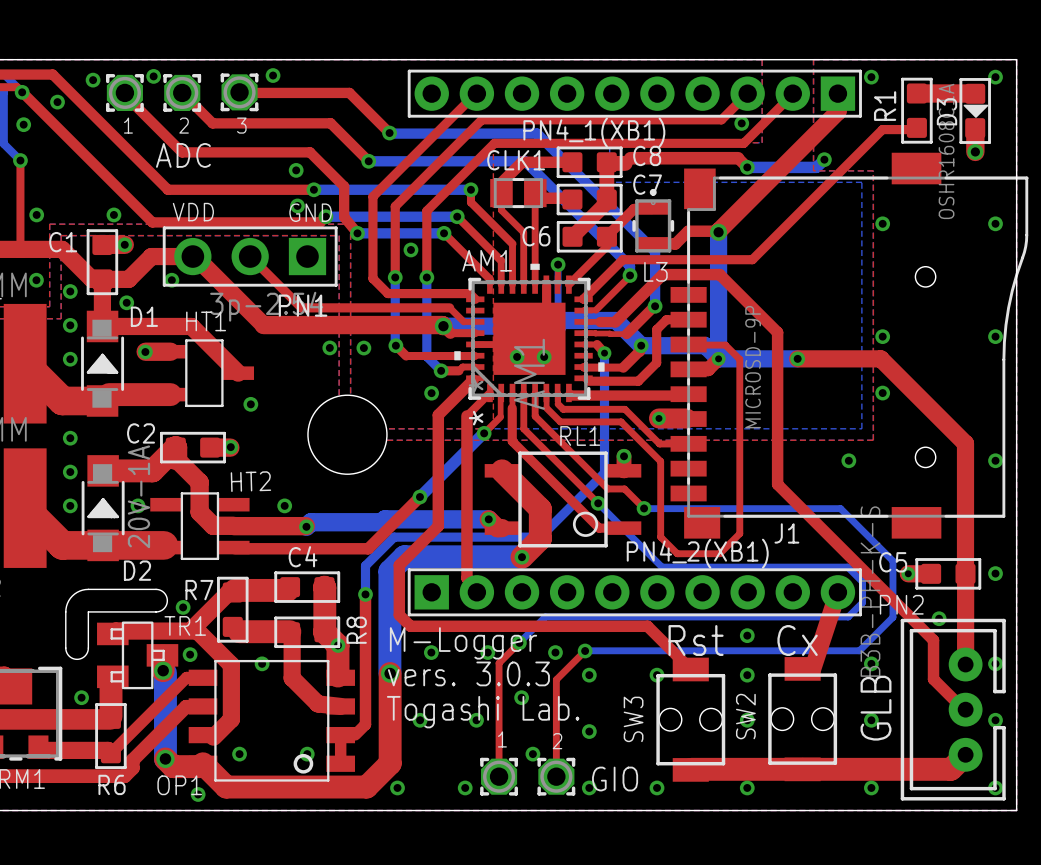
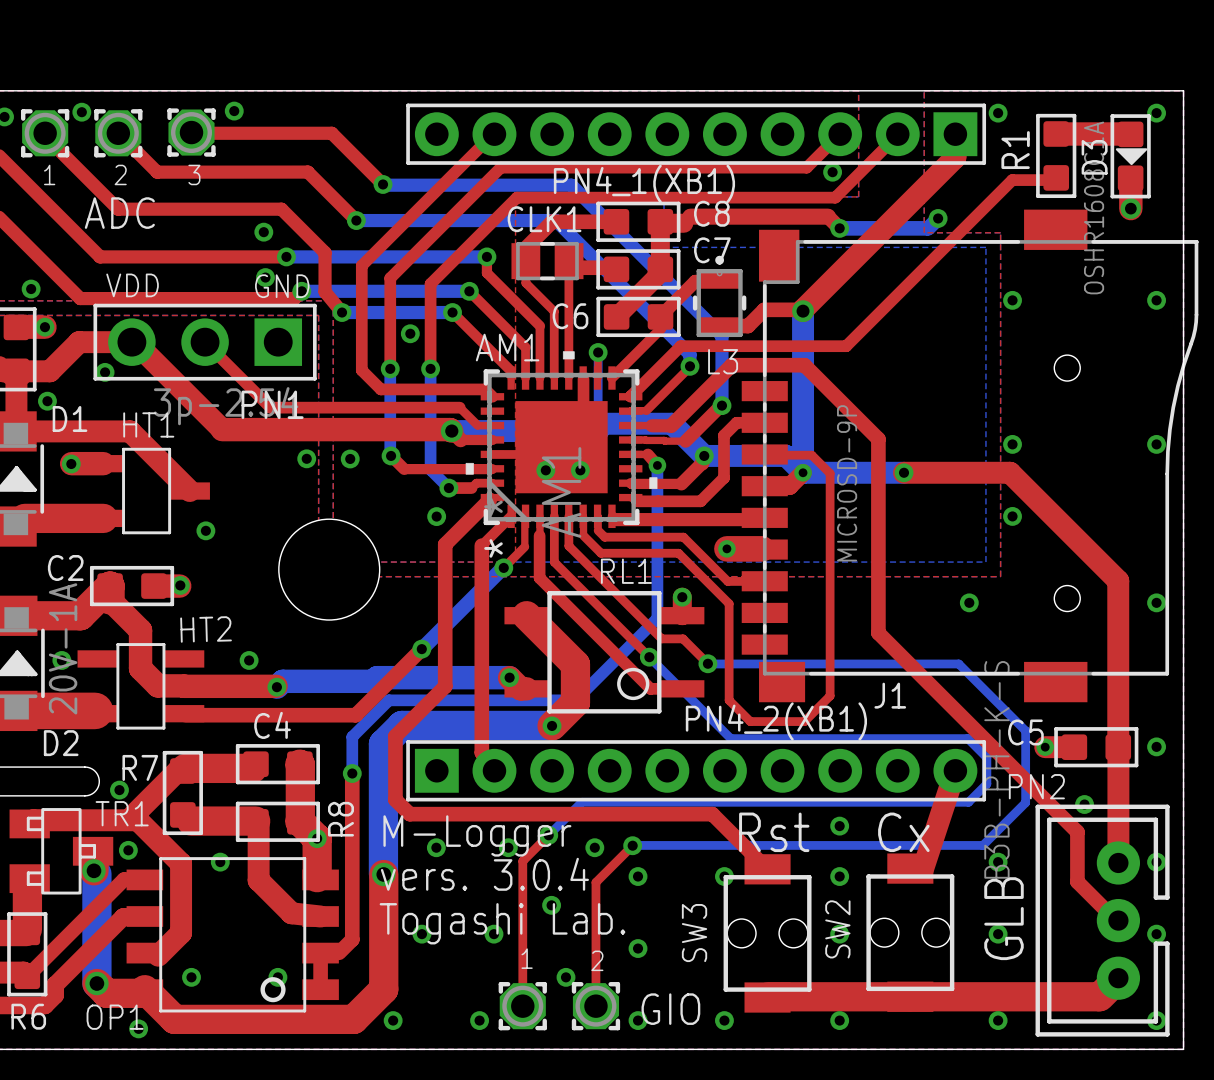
text: vers. 3.0.3 (468, 673) -> vers. 3.0.4 (484, 874)

